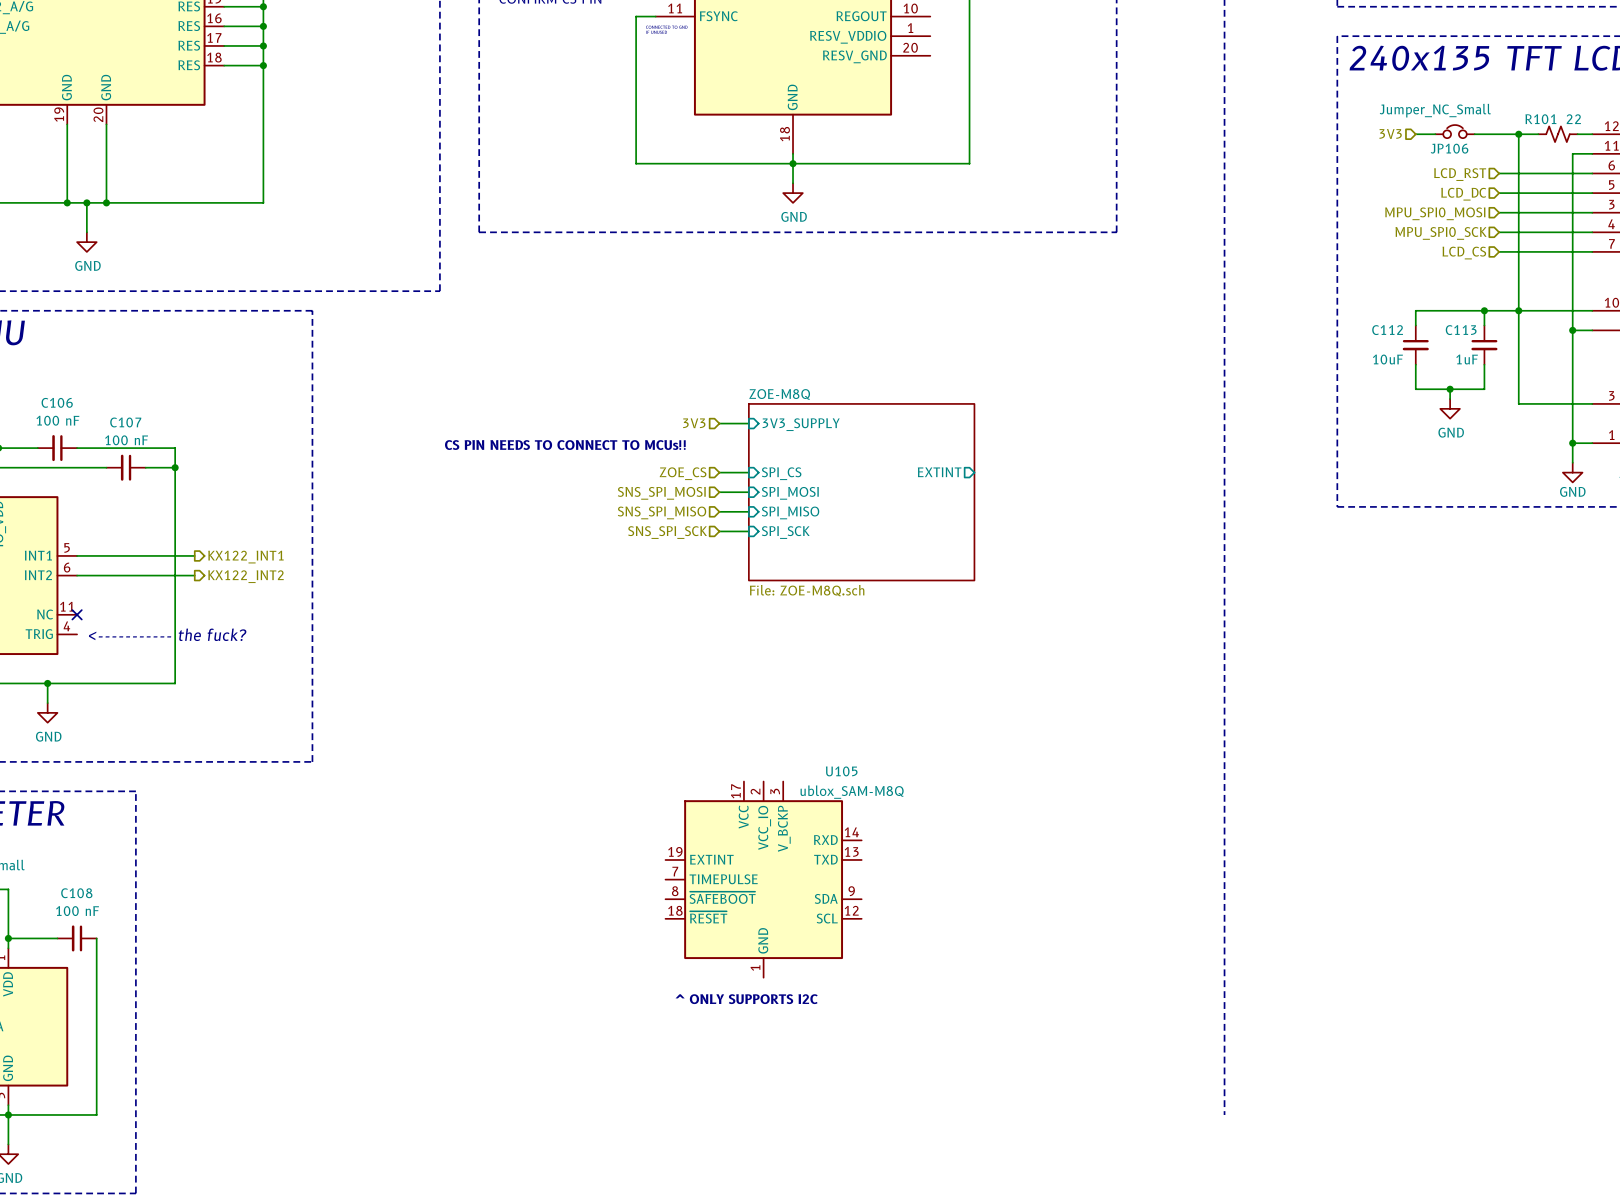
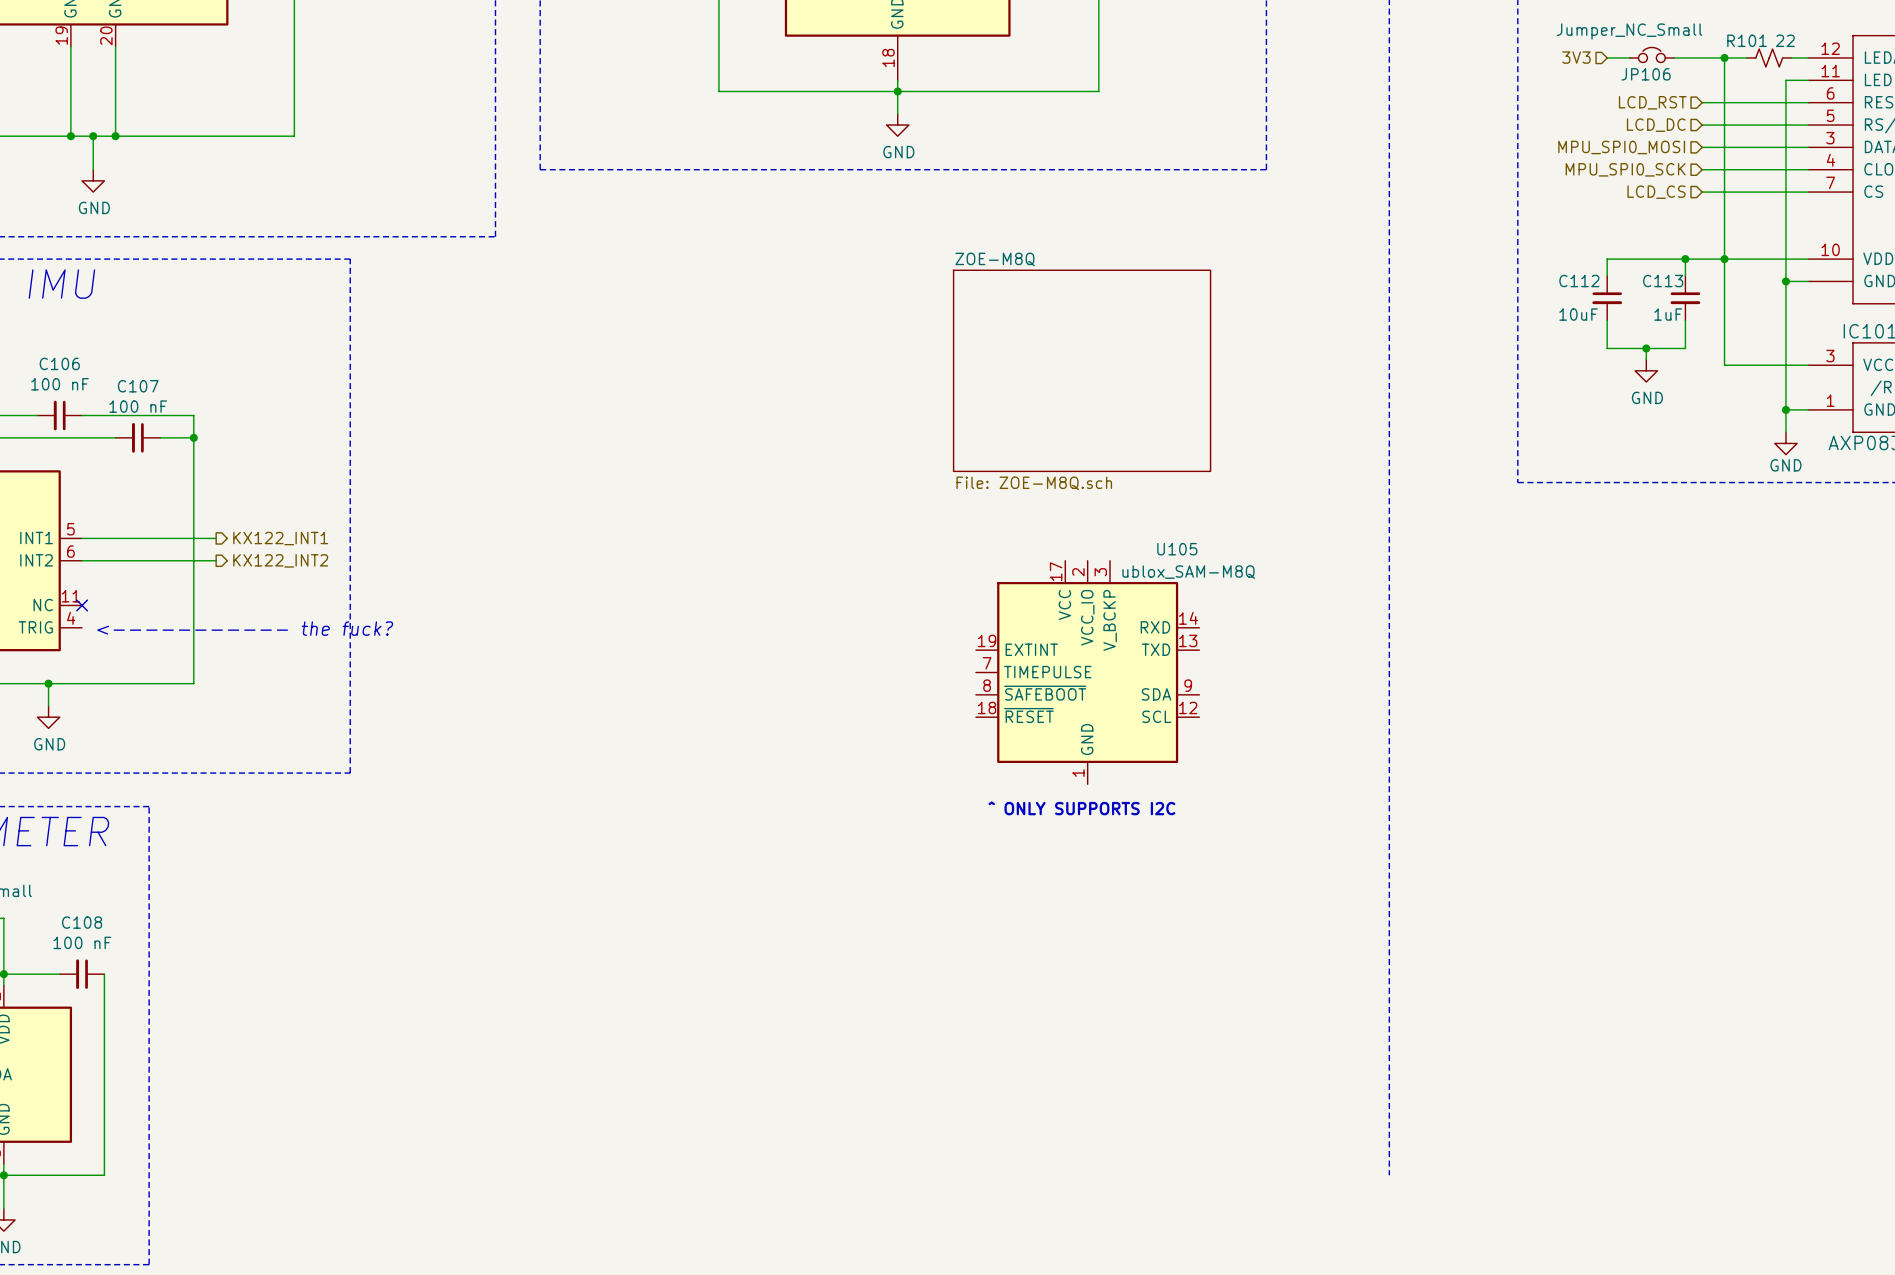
hierarchical label: 3V3 (694, 423) -> none
wire: (719, 423) (748, 423) -> none
sheet pin: 3V3_SUPPLY (801, 424) -> none
text: CS PIN NEEDS TO CONNECT TO MCUs!! (565, 445) -> none
wire: (719, 472) (748, 472) -> none
sheet pin: EXTINT (939, 472) -> none
hierarchical label: ZOE_CS (683, 473) -> none
sheet pin: SPI_CS (781, 473) -> none
wire: (719, 492) (748, 492) -> none
sheet ZOE-M8Q position: (861, 492) -> (1082, 370)
hierarchical label: SNS_SPI_MOSI (661, 493) -> none
sheet pin: SPI_MOSI (790, 493) -> none
wire: (719, 511) (748, 511) -> none
hierarchical label: SNS_SPI_MISO (662, 512) -> none
sheet pin: SPI_MISO (790, 512) -> none
wire: (719, 531) (748, 531) -> none
hierarchical label: SNS_SPI_SCK (667, 532) -> none
sheet pin: SPI_SCK (785, 532) -> none
text: none -> ^ ONLY SUPPORTS I2C (1081, 808)
U105 position: (763, 879) -> (1087, 672)
text: ^ ONLY SUPPORTS I2C (746, 999) -> none

